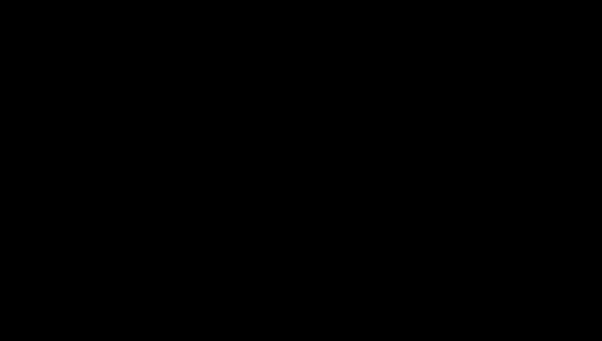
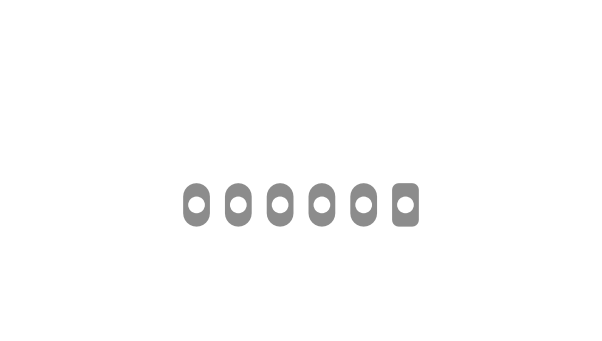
part: none -> (301, 204)

